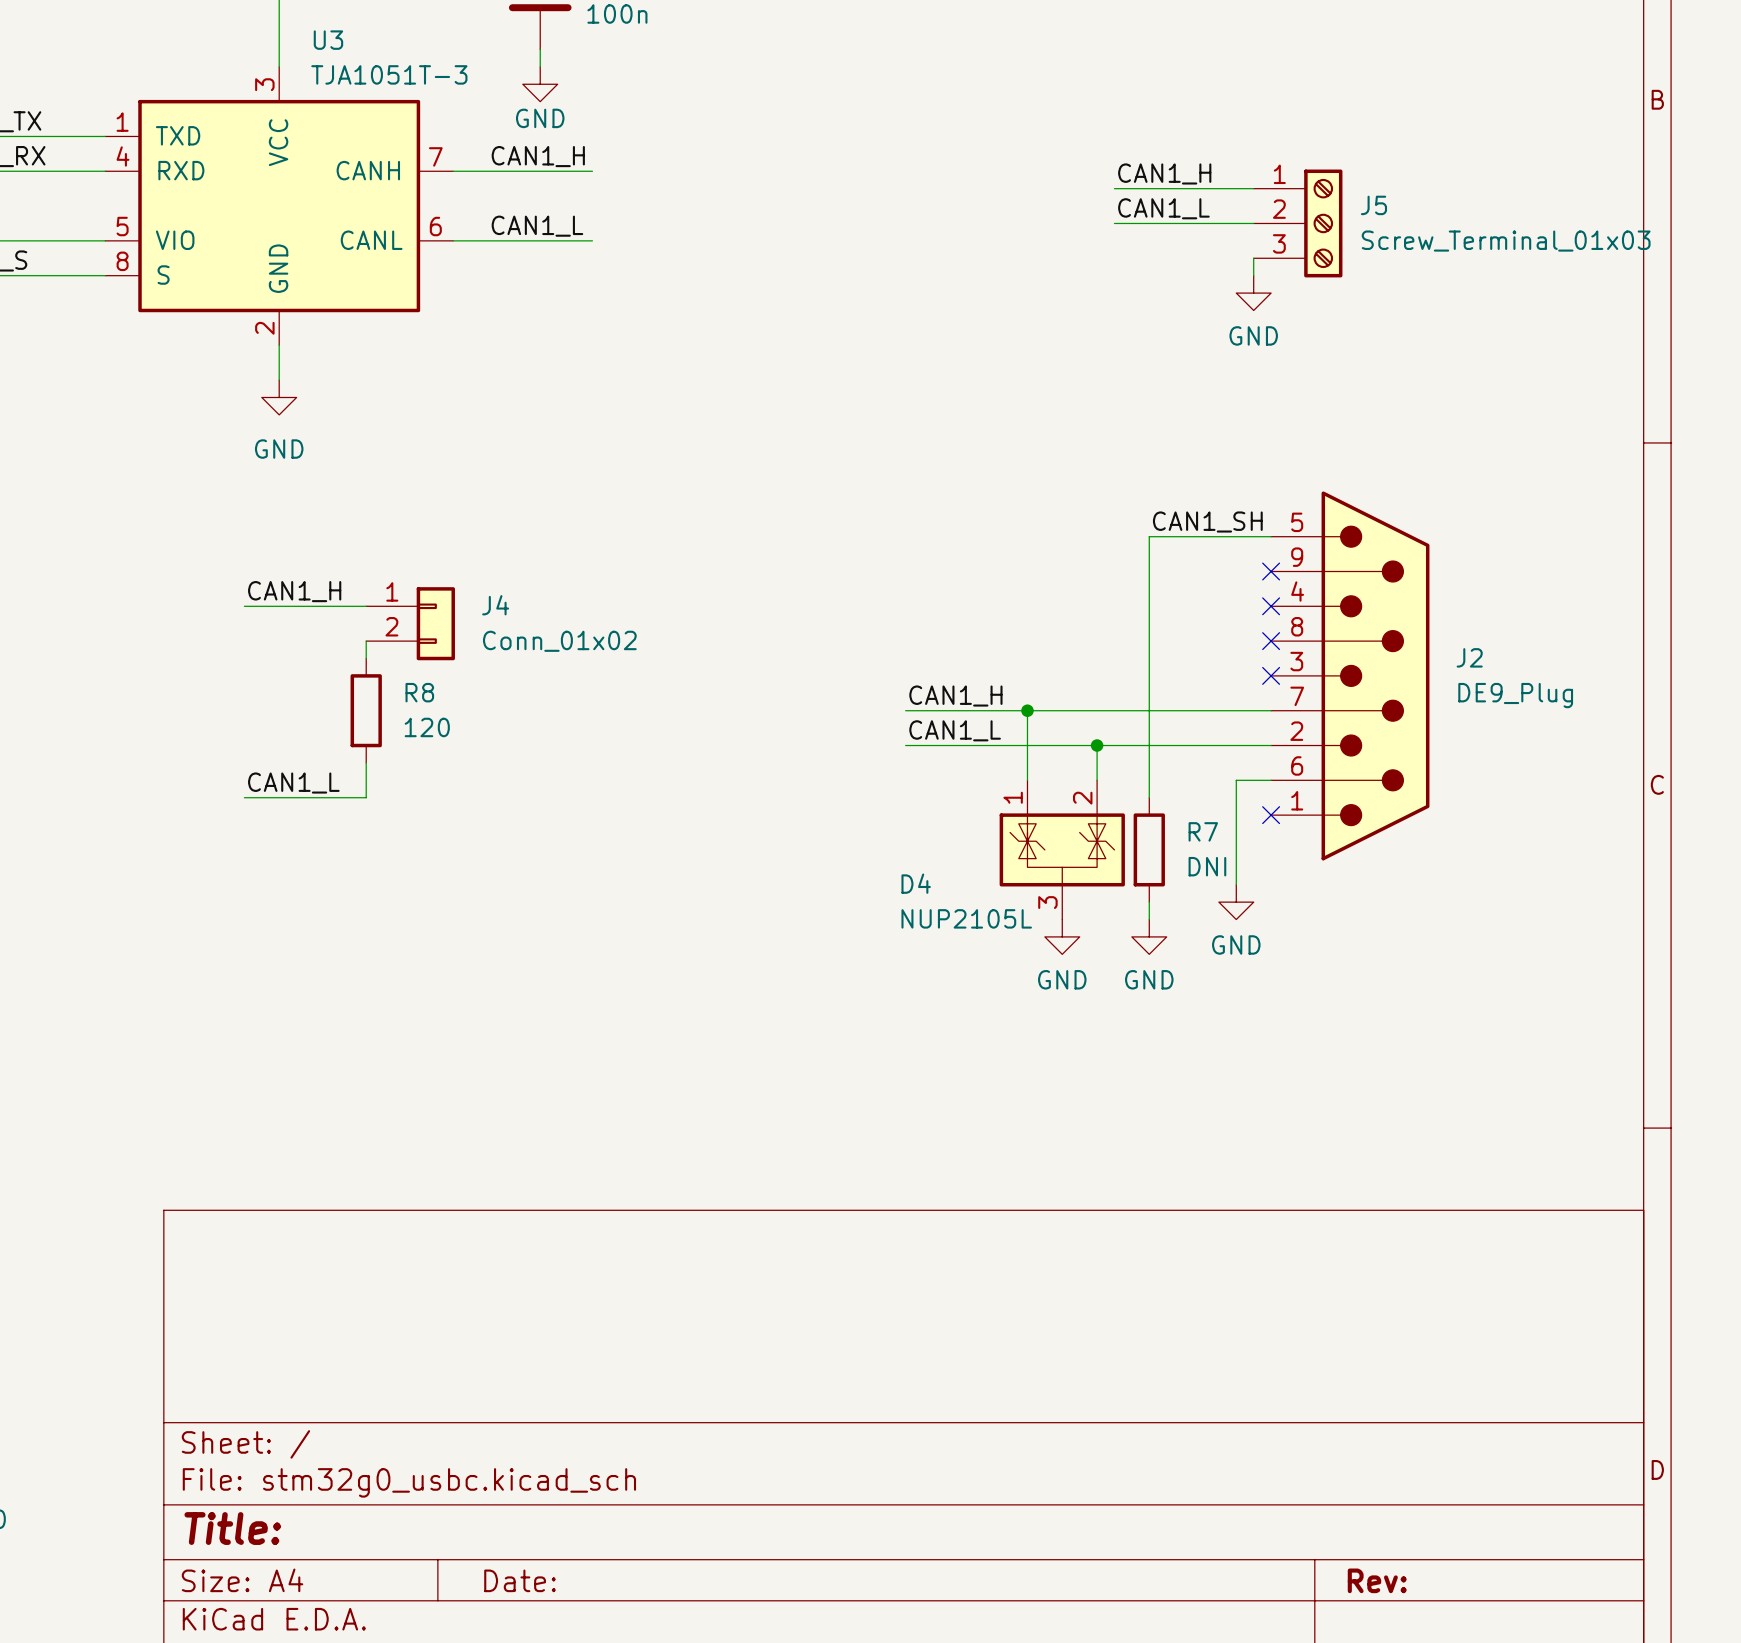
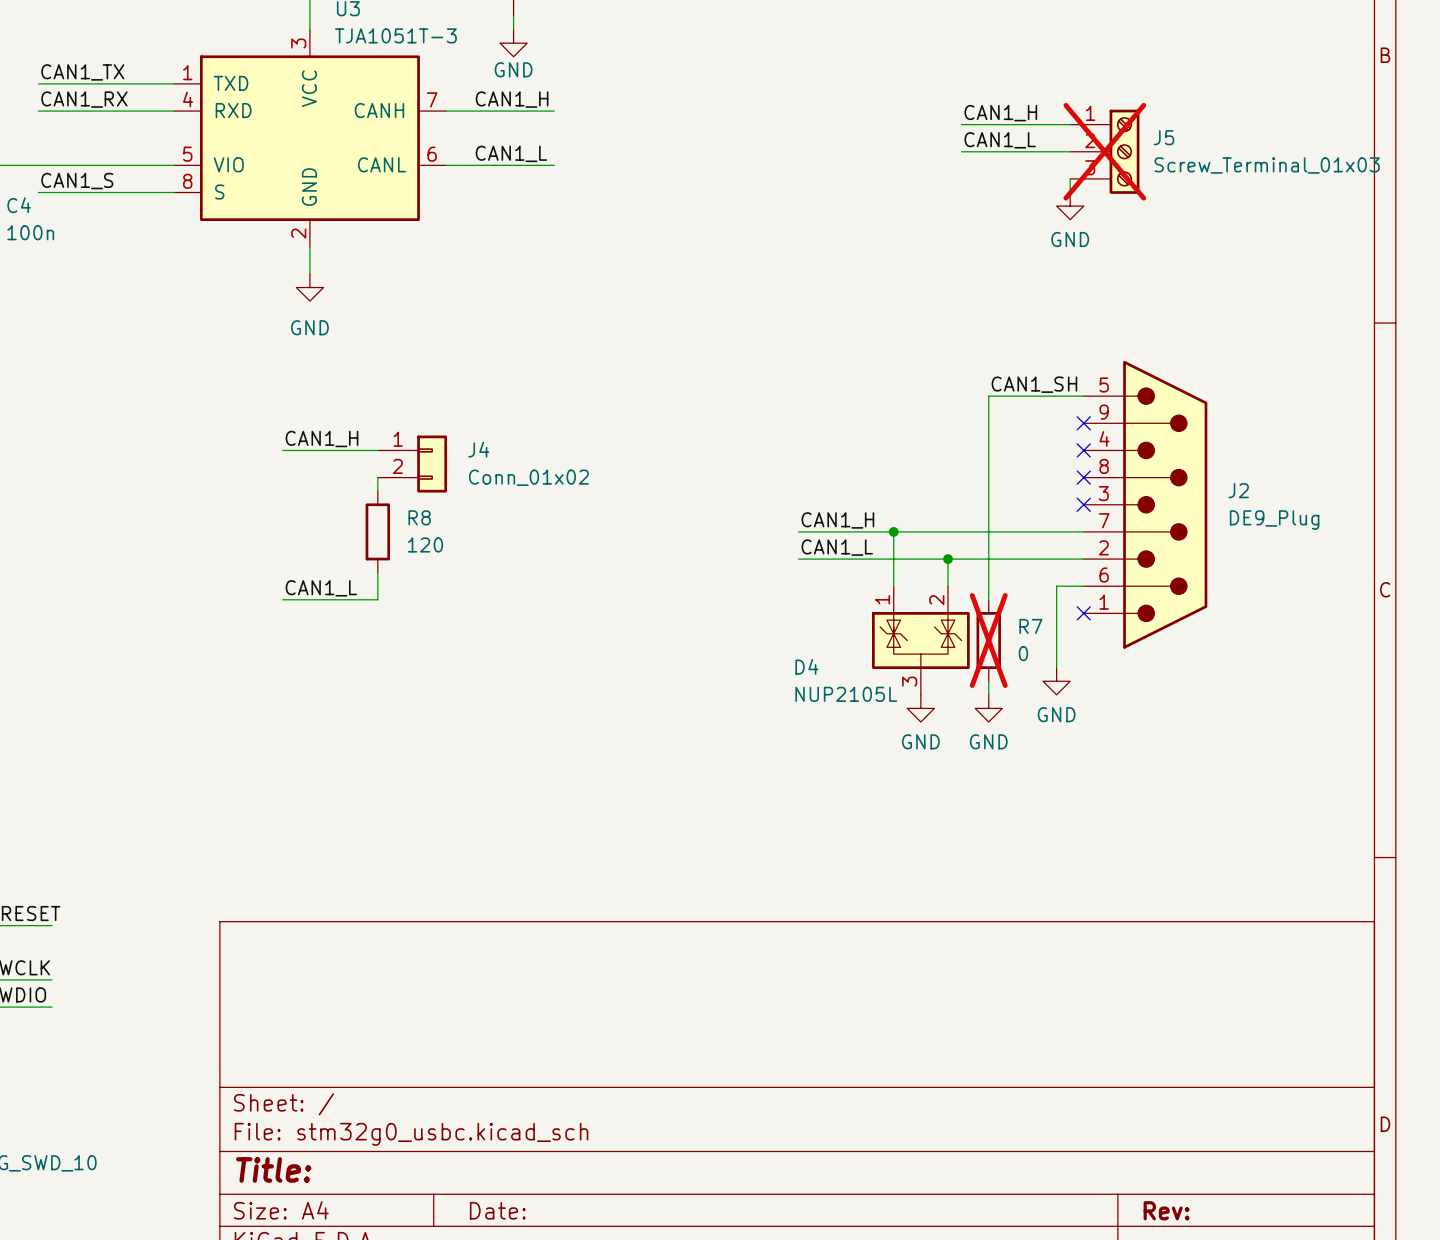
J5 do-not-place cross: none -> (1104, 151)
R7 do-not-place cross: none -> (988, 640)
R7 value: DNI (1207, 866) -> 0 (1023, 653)

